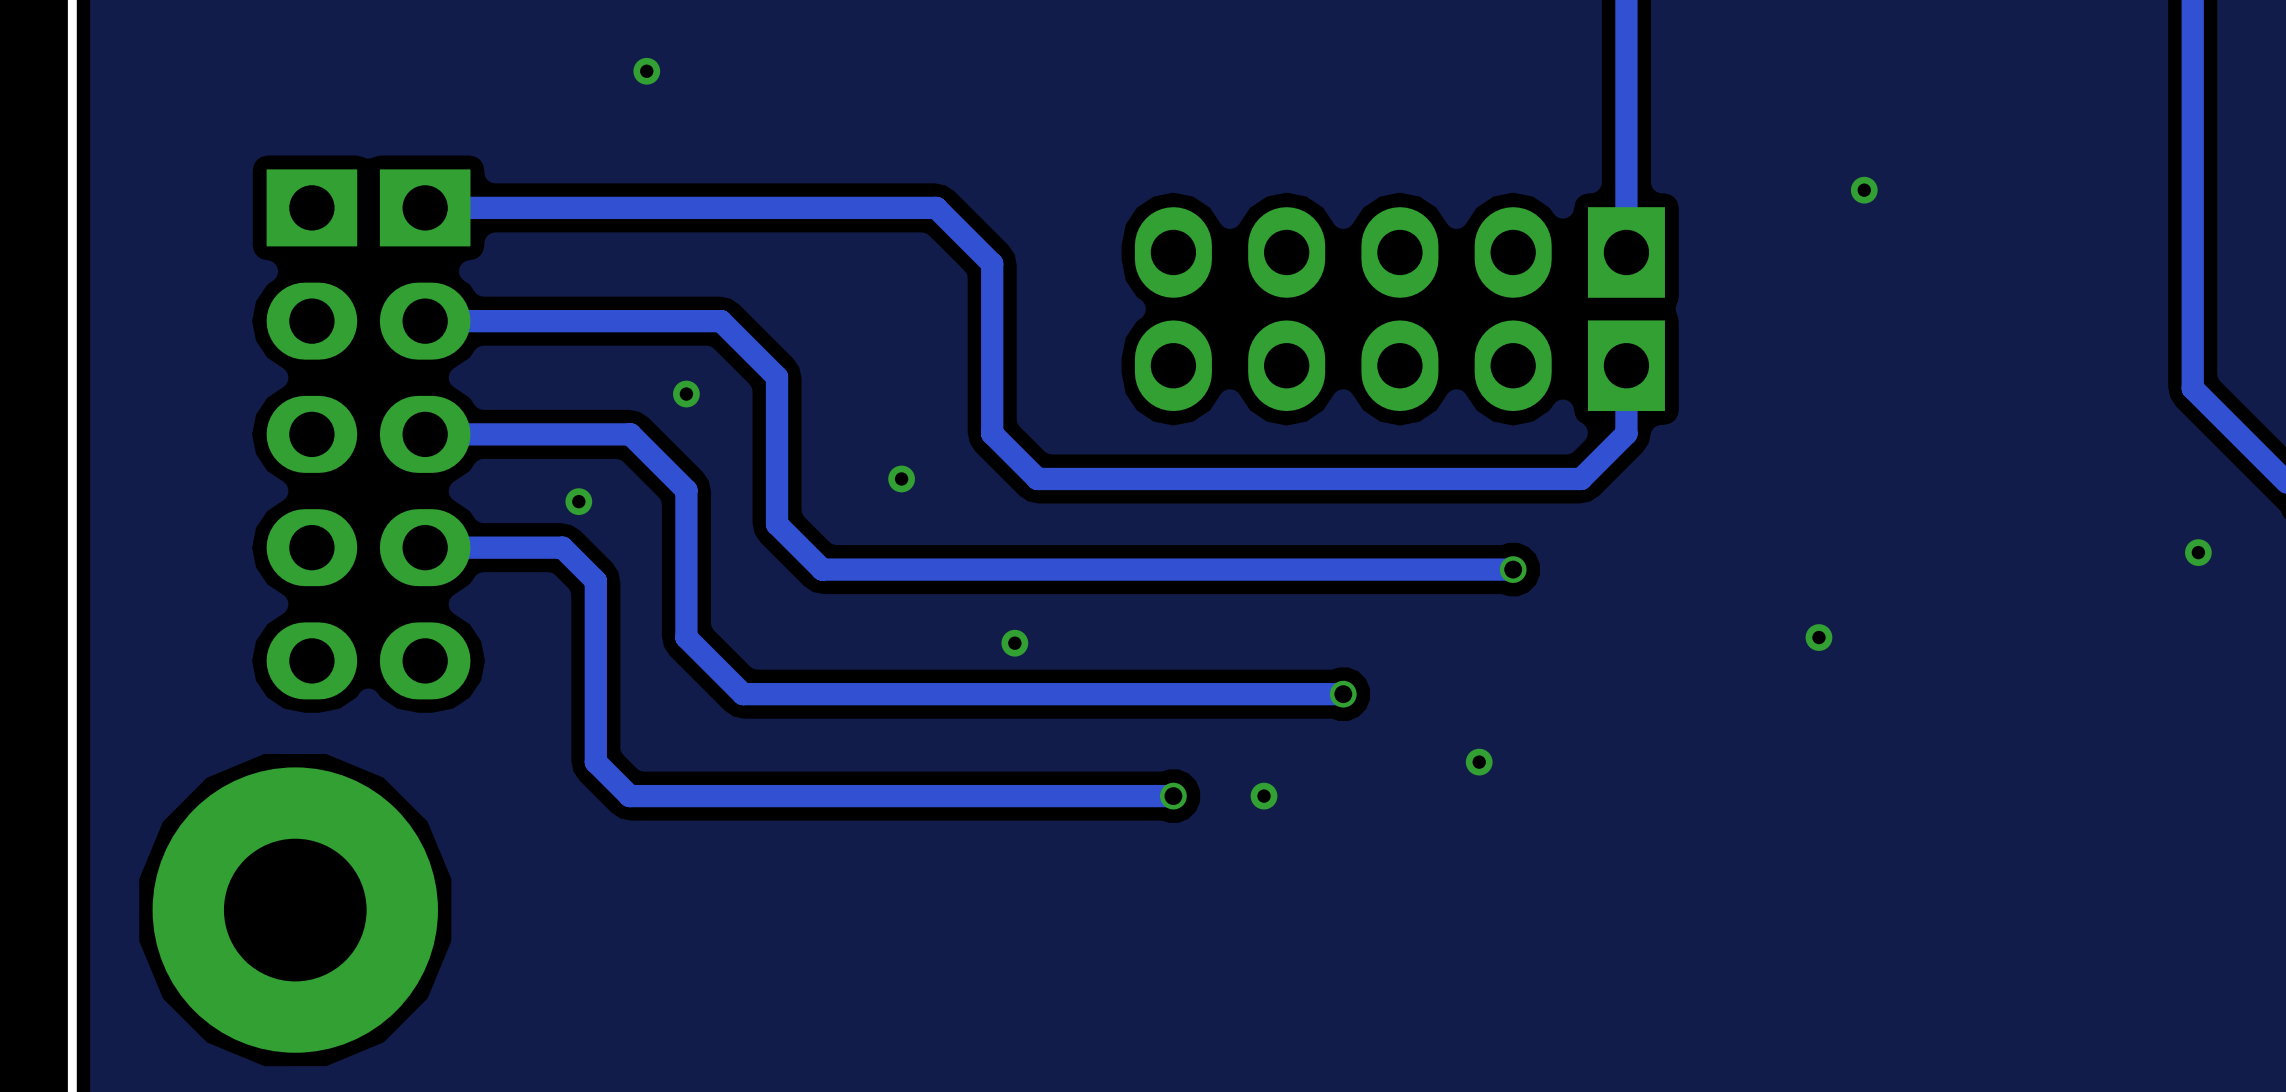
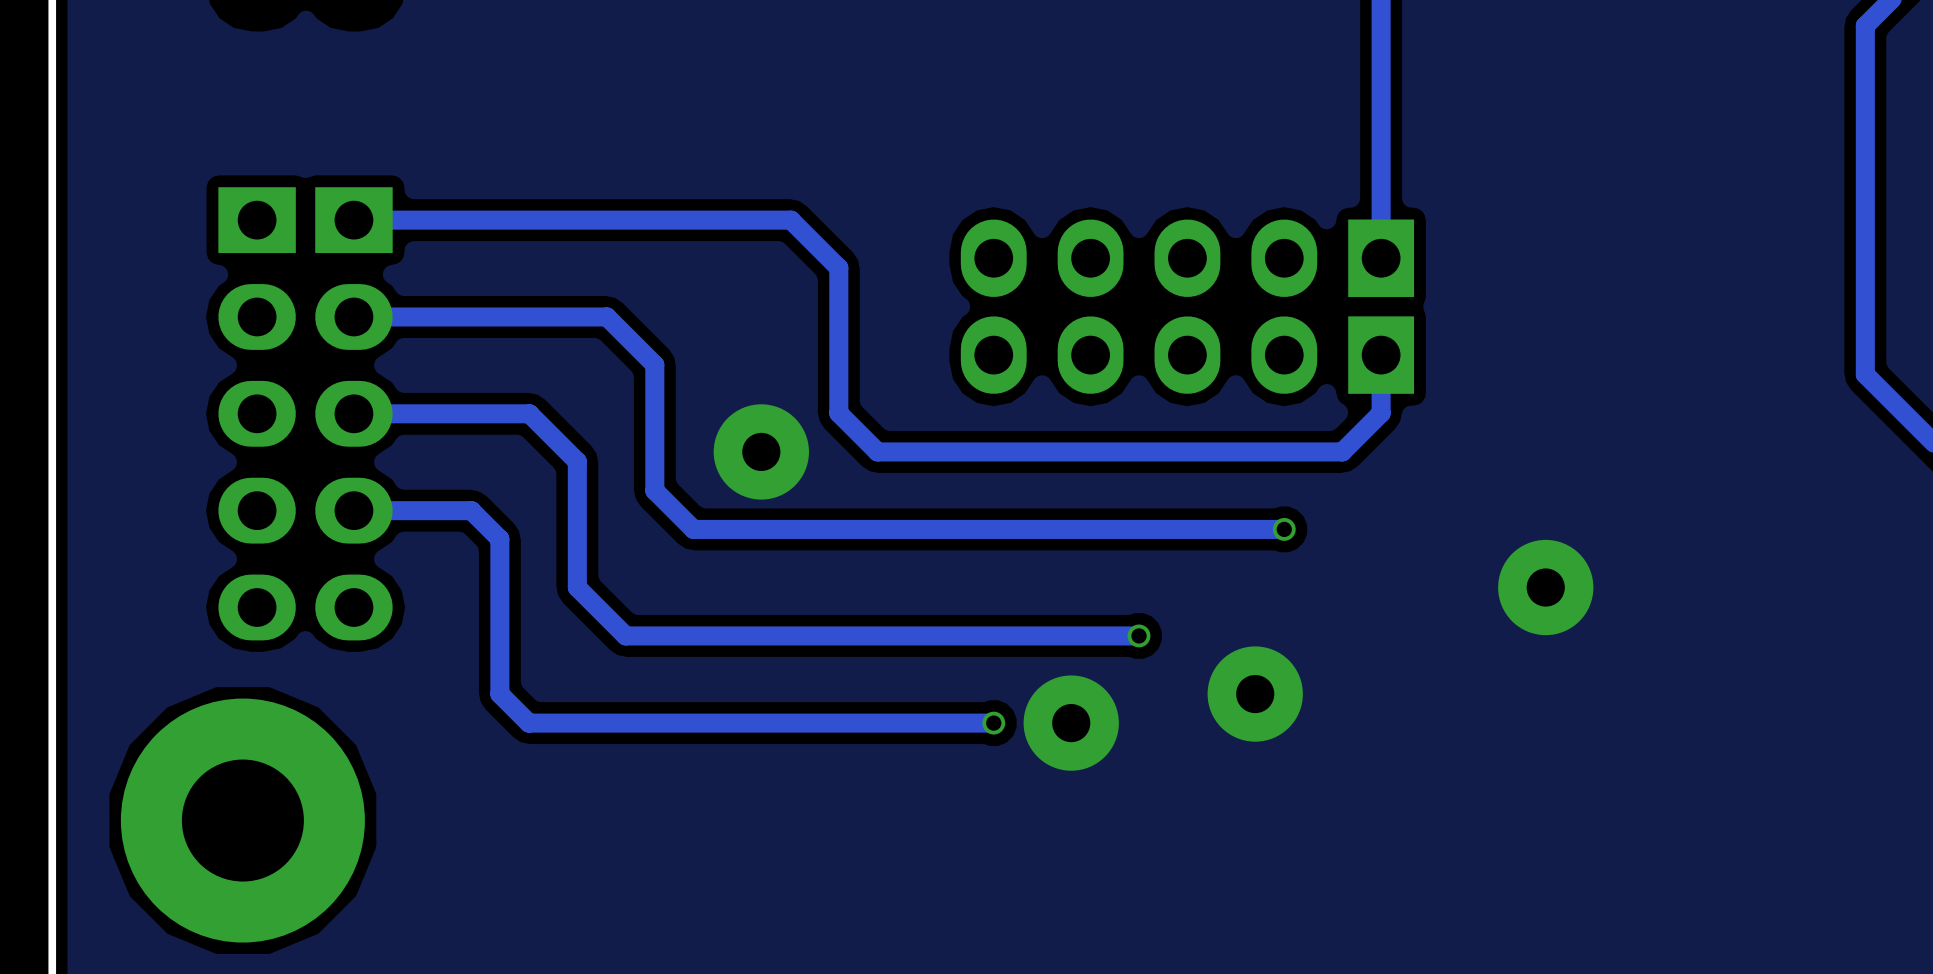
part: (646, 71) -> none
part: (1864, 190) -> none
part: (686, 394) -> none
part footprint: [888, 465, 915, 493] -> [713, 404, 809, 500]
part: (578, 501) -> none
part: (2198, 552) -> none
part footprint: [1805, 624, 1833, 651] -> [1498, 539, 1594, 636]
part: (1014, 643) -> none
part footprint: [1465, 748, 1493, 776] -> [1207, 646, 1303, 742]
part footprint: [1250, 782, 1278, 810] -> [1023, 675, 1119, 771]

